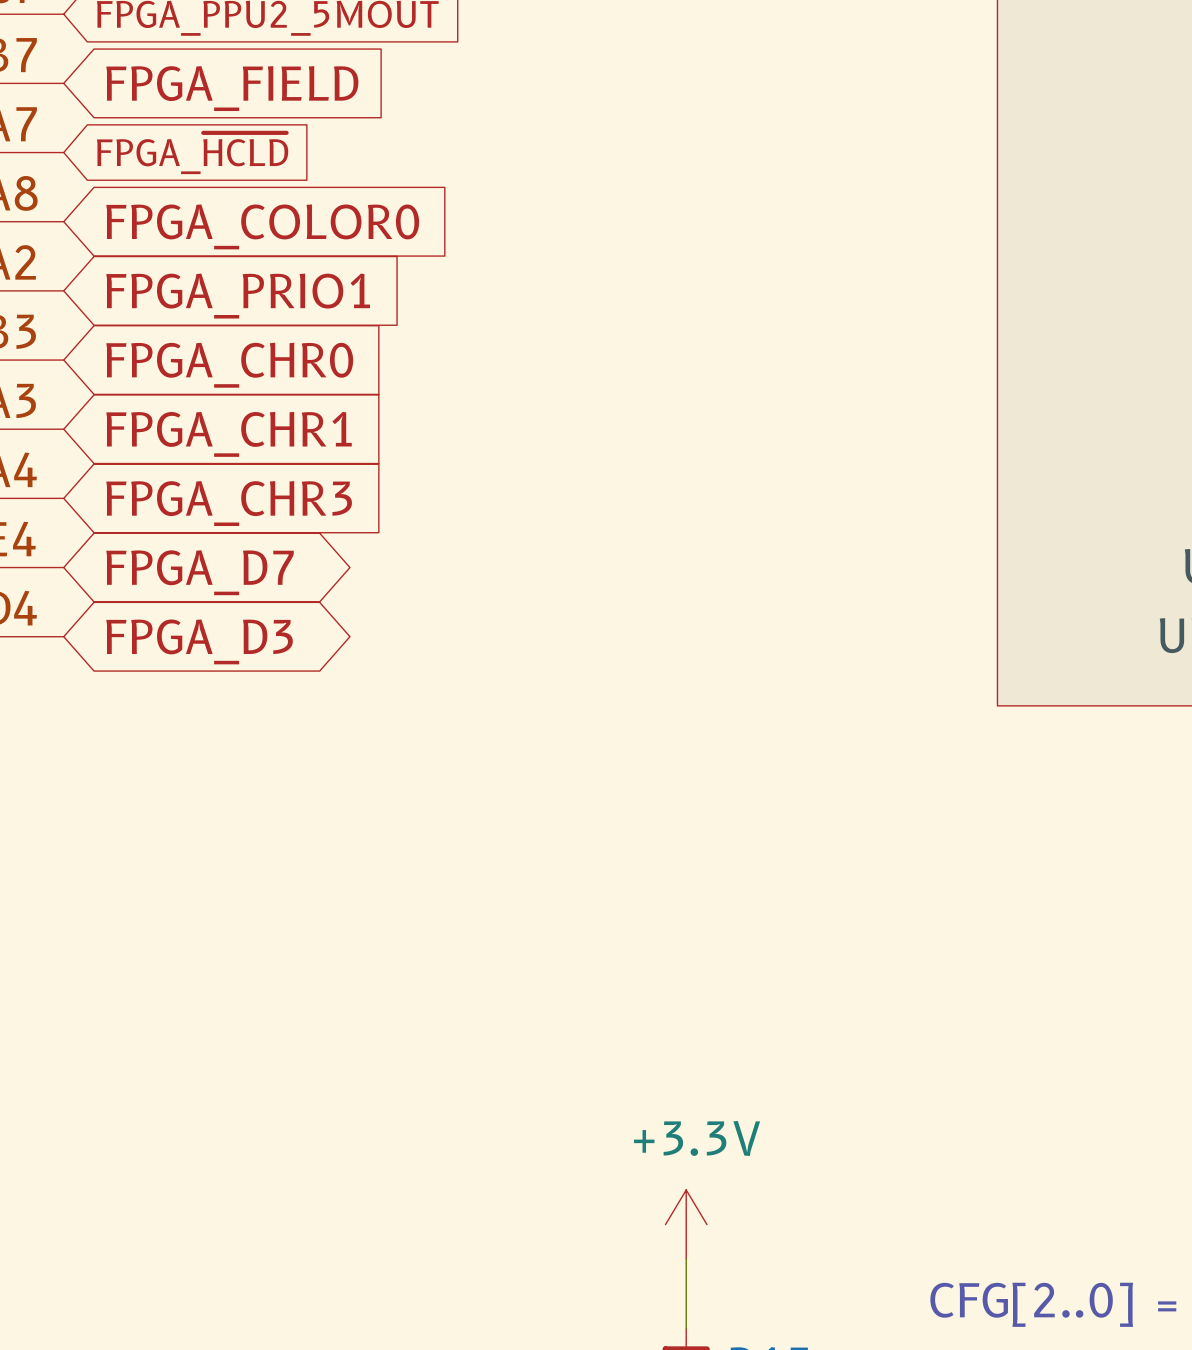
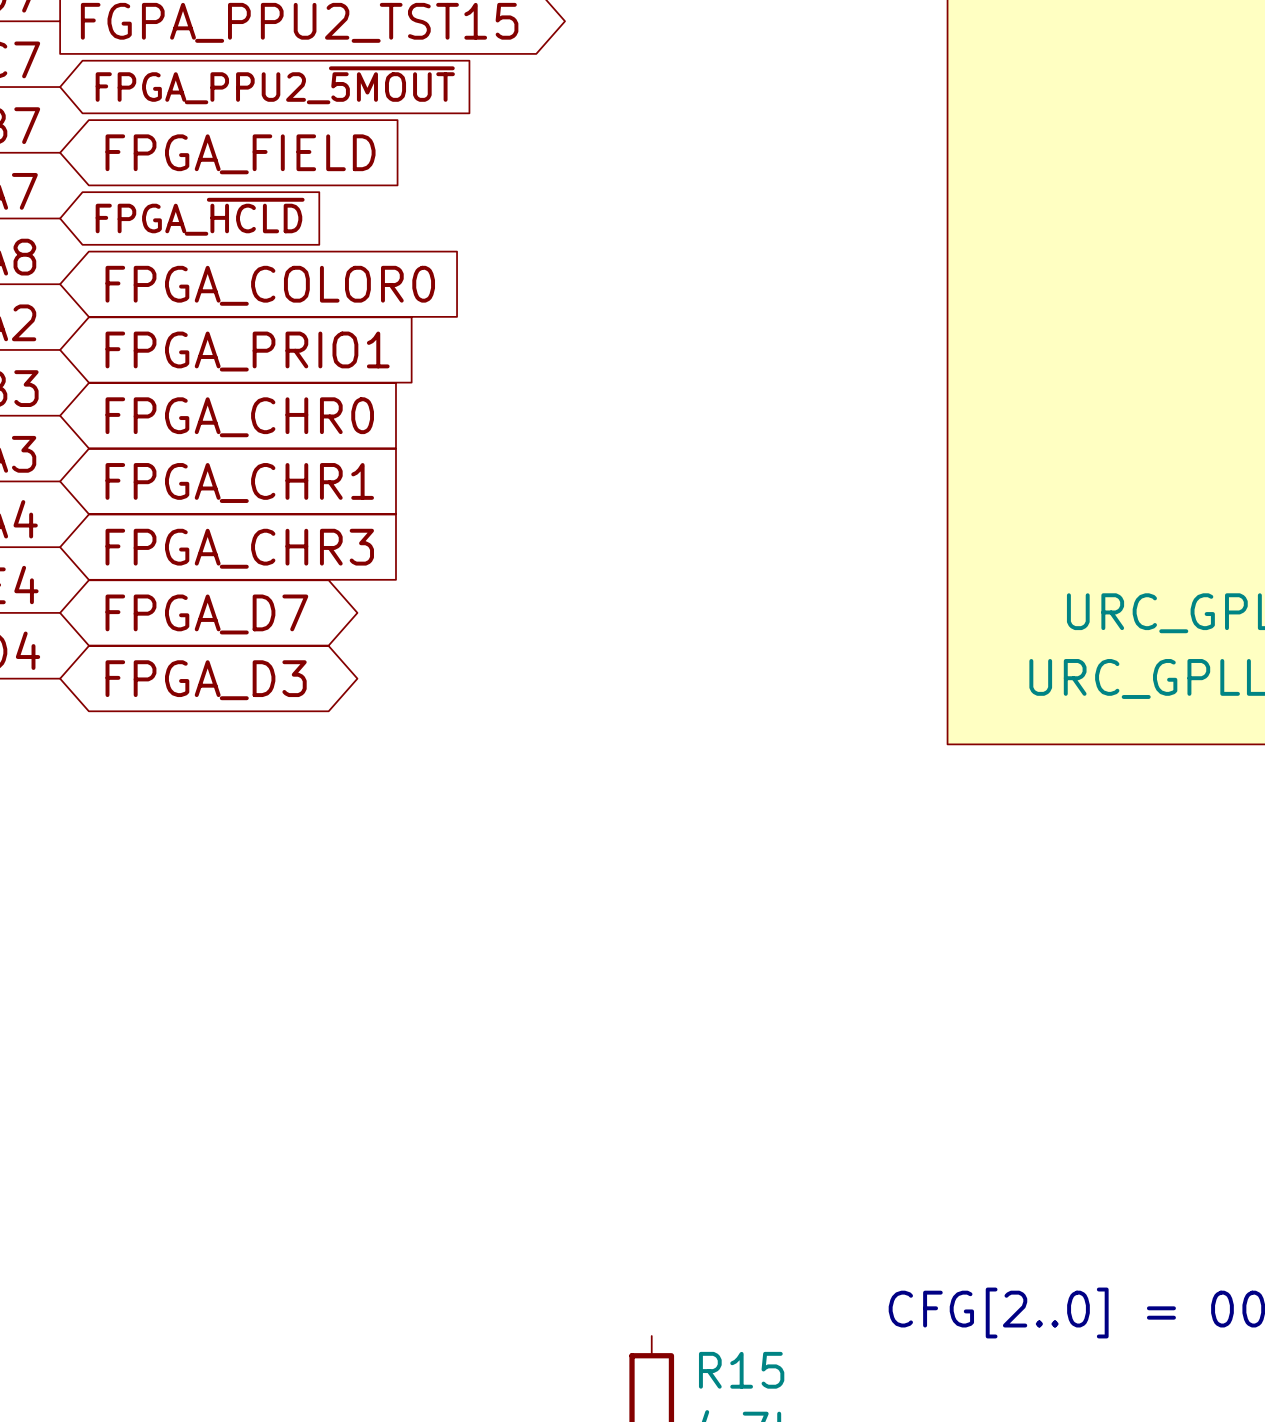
power symbol: +3.3V (686, 1224) -> none
wire: (686, 1259) (686, 1328) -> none

